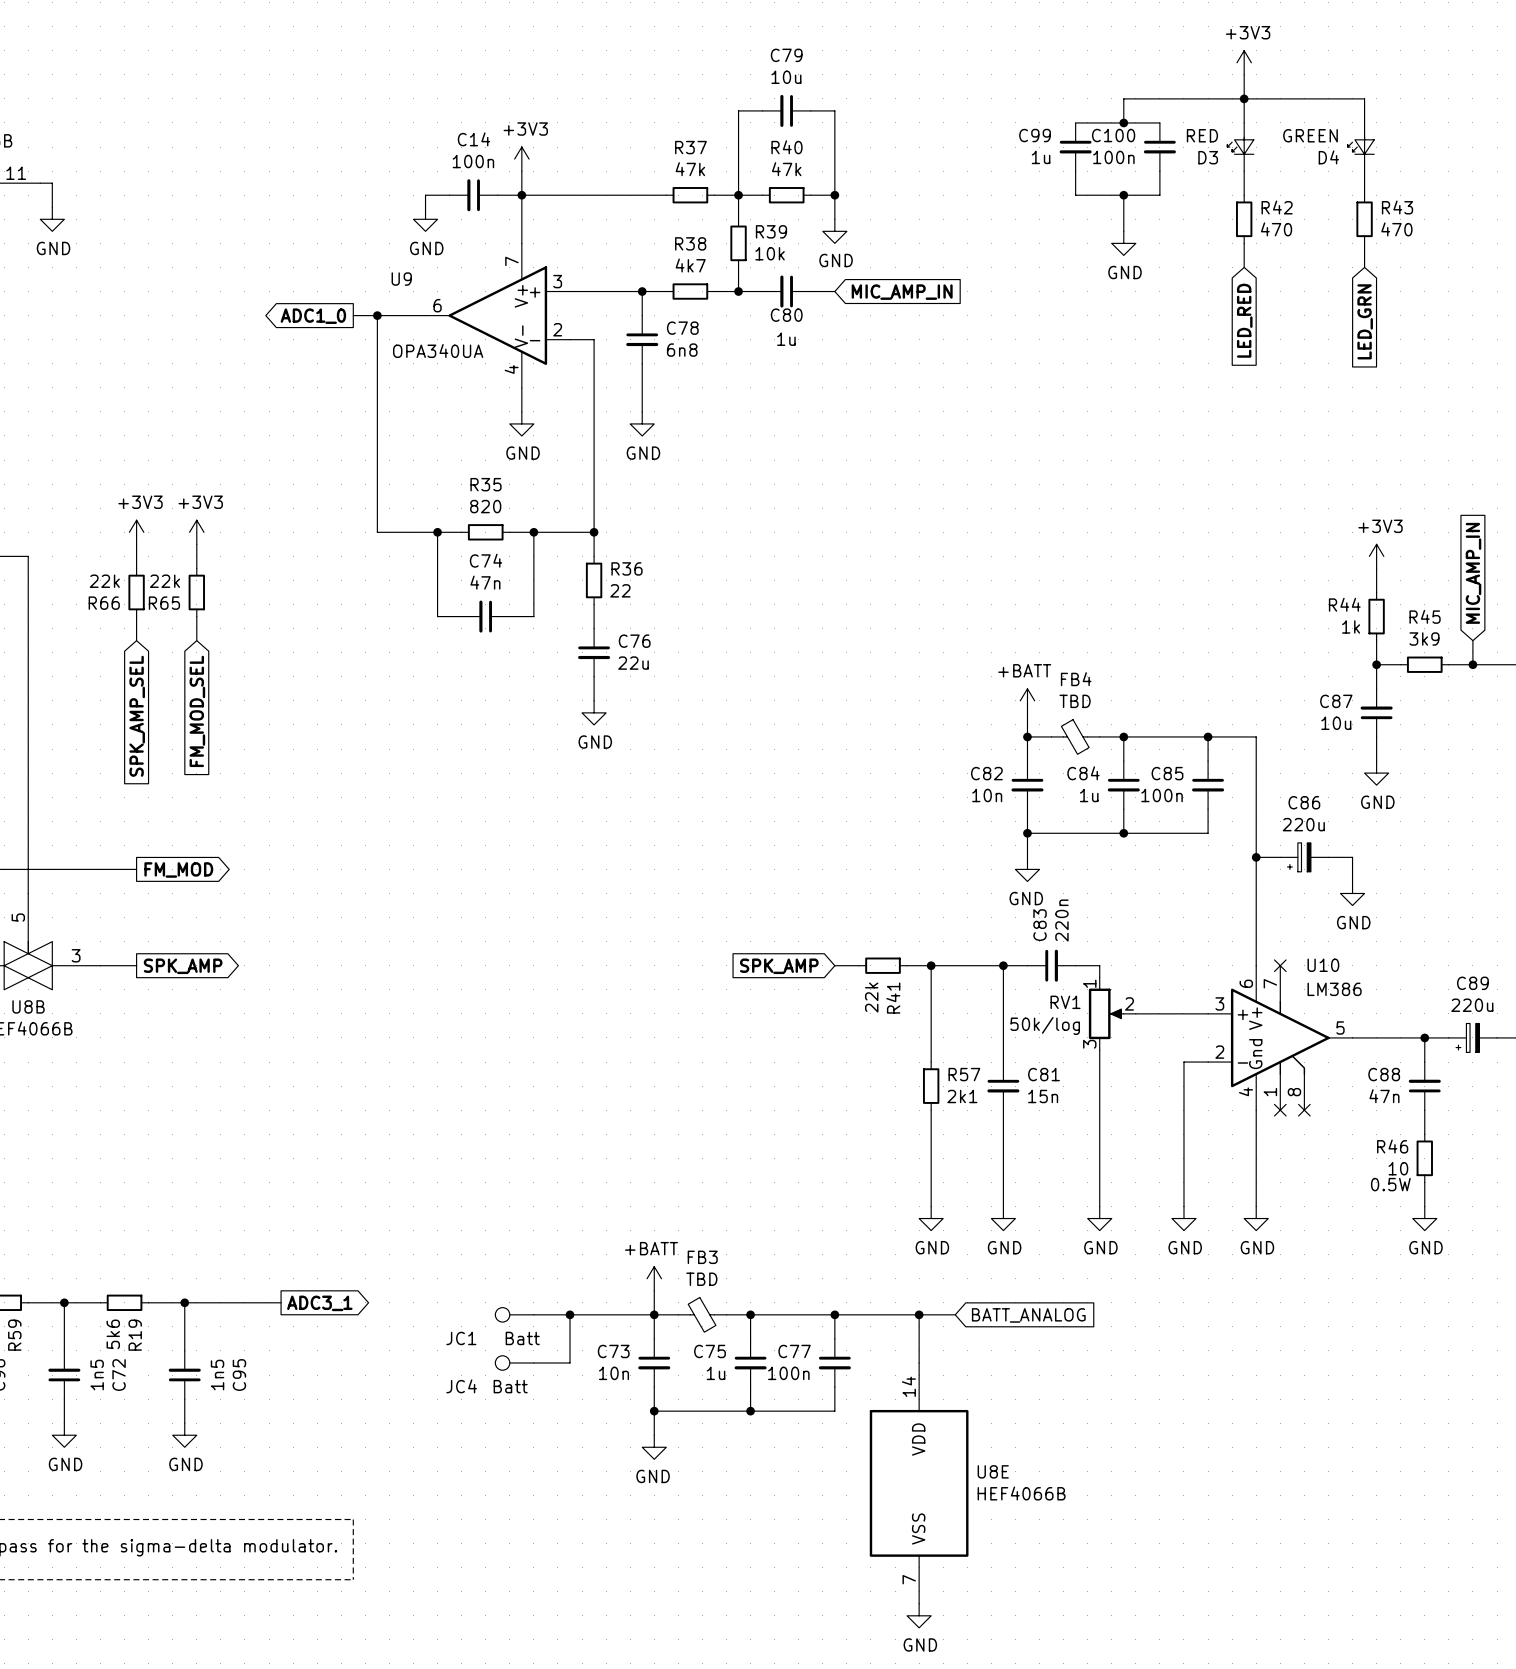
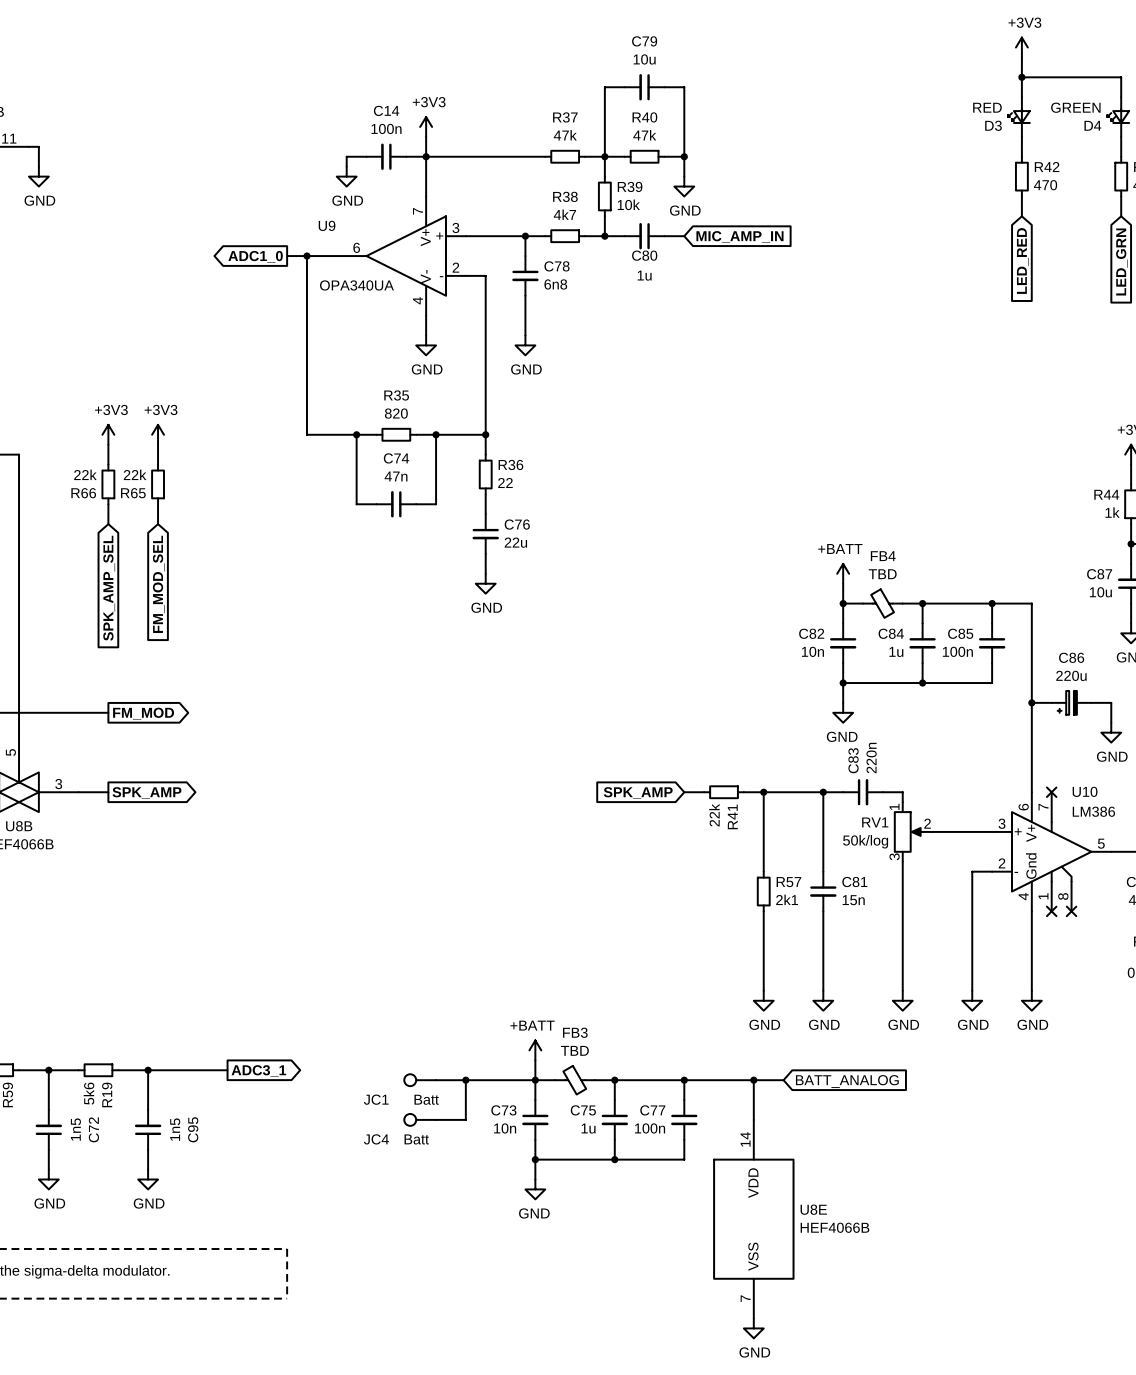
wire: (1244, 98) (1123, 98) (1123, 122) -> none
wire: (1075, 122) (1159, 122) -> none
junction: (1123, 122) -> none
C99: 1u (1075, 147) -> none
C100: 100n (1159, 147) -> none
wire: (1075, 171) (1075, 195) (1159, 195) (1159, 171) -> none
wire: (1123, 195) (1123, 231) -> none
junction: (1123, 195) -> none
power symbol: GND (1123, 243) -> none

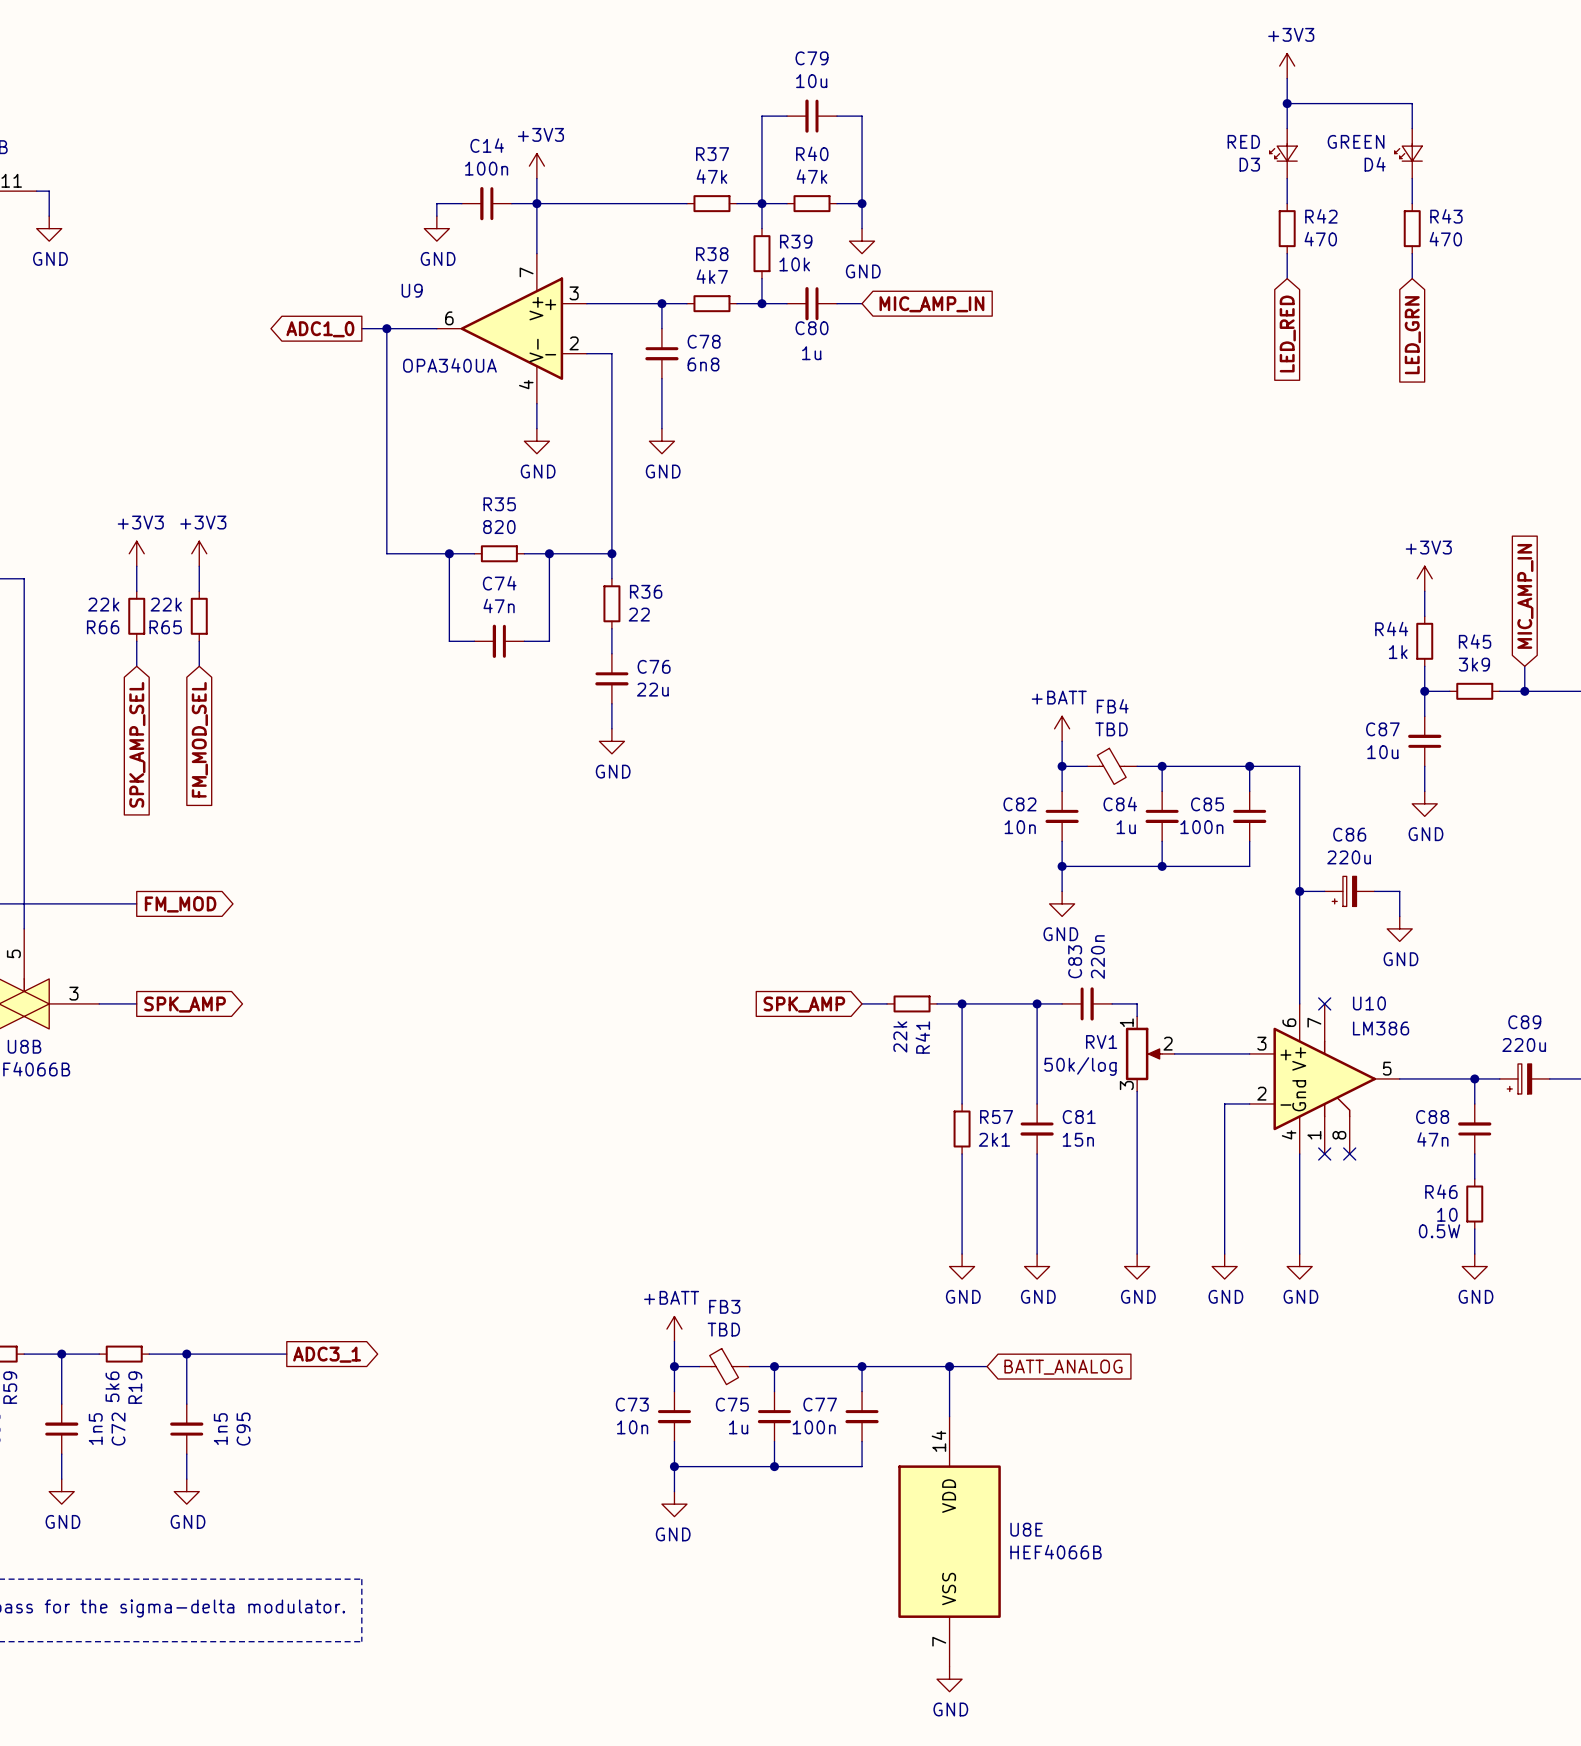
JC1: Batt (420, 1080) -> none
wire: (436, 1080) (535, 1080) -> none
wire: (465, 1080) (465, 1119) (436, 1119) -> none
junction: (465, 1080) -> none
JC4: Batt (420, 1119) -> none

